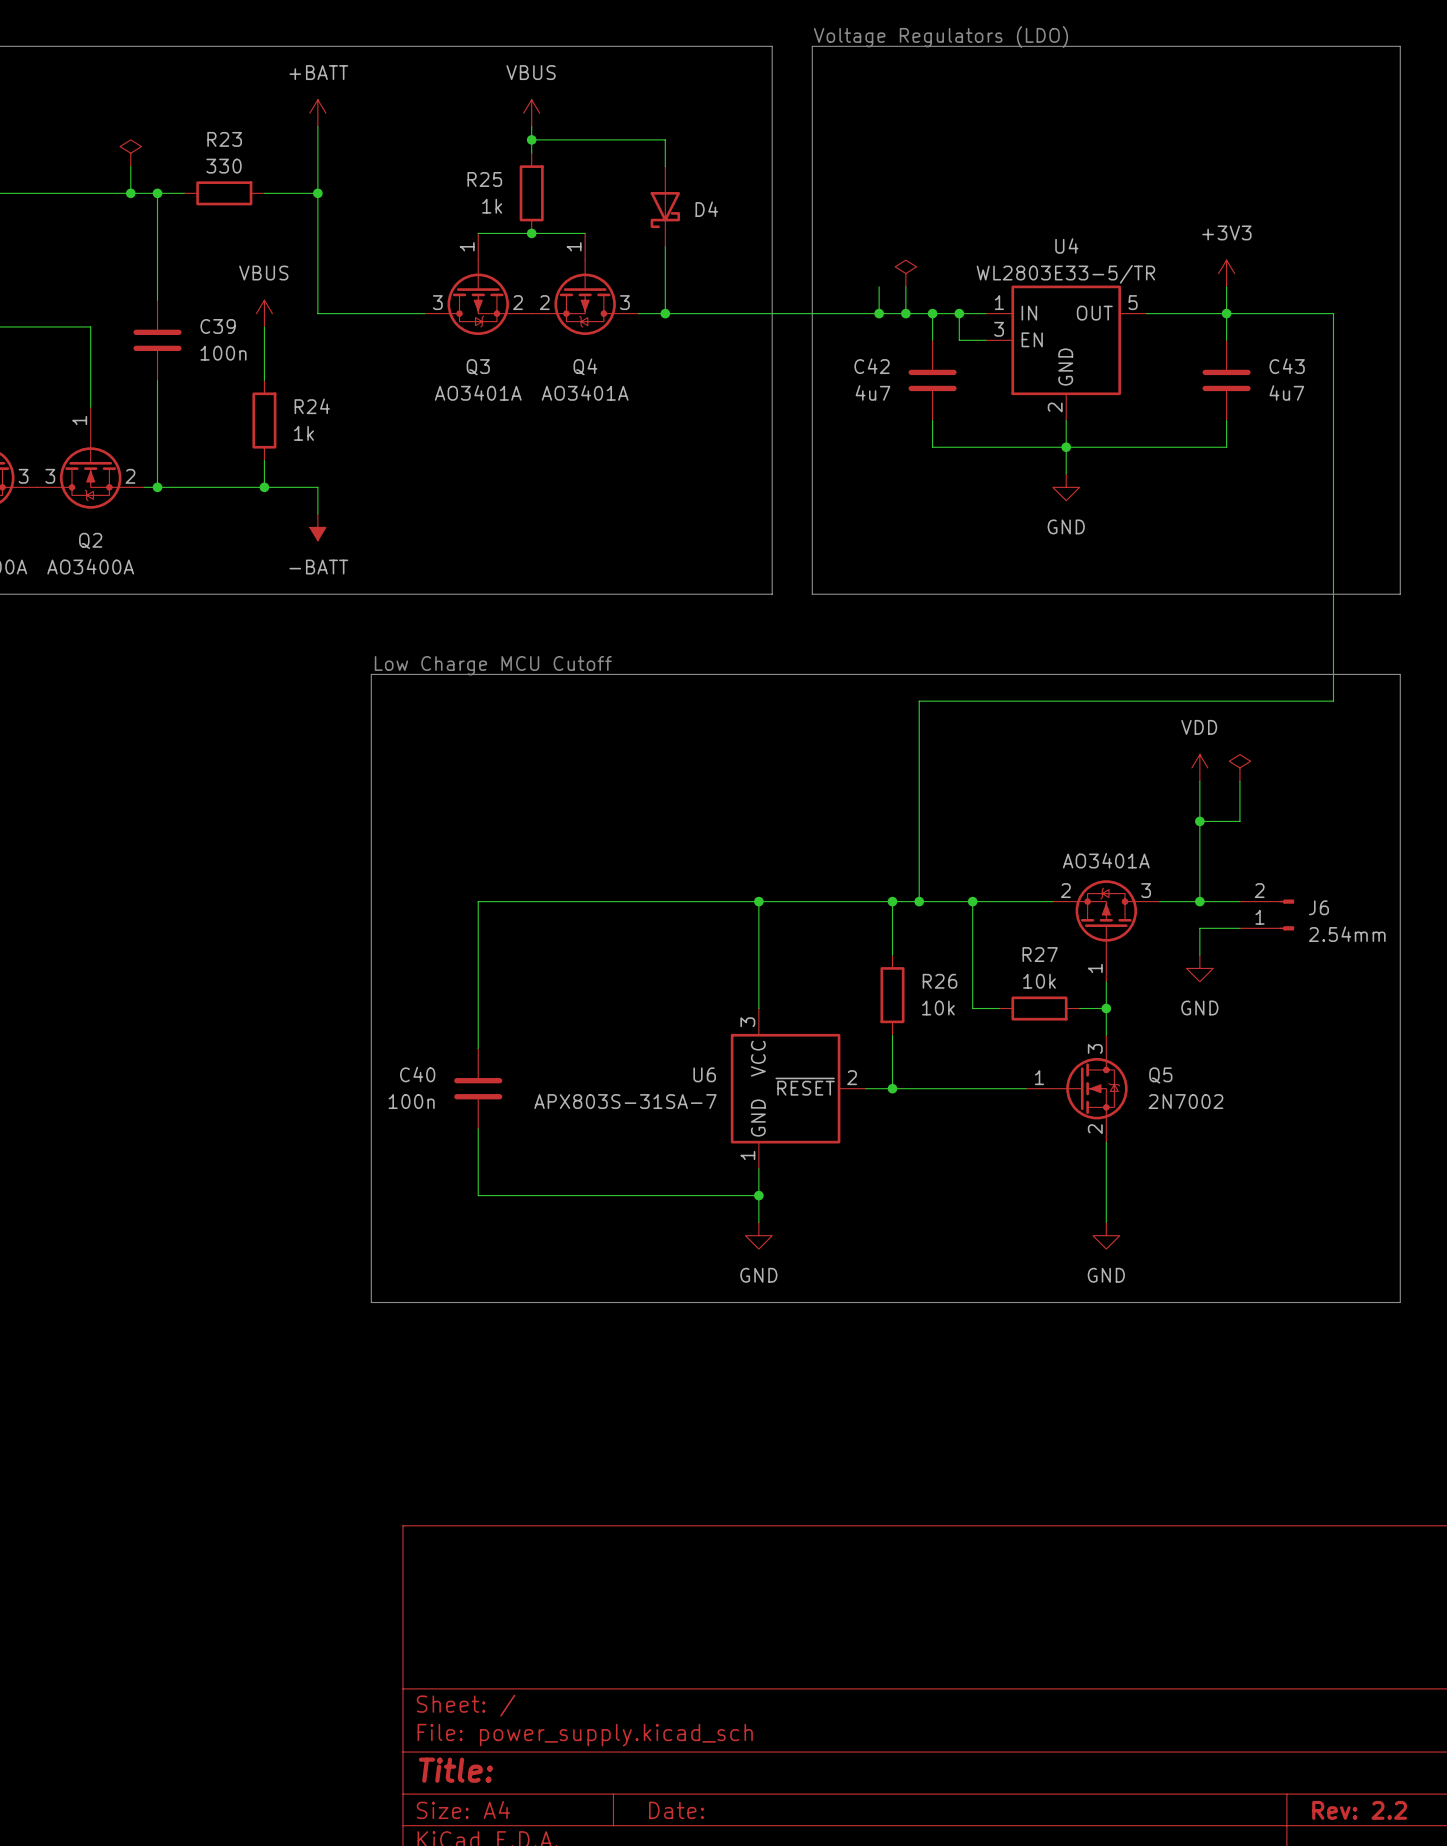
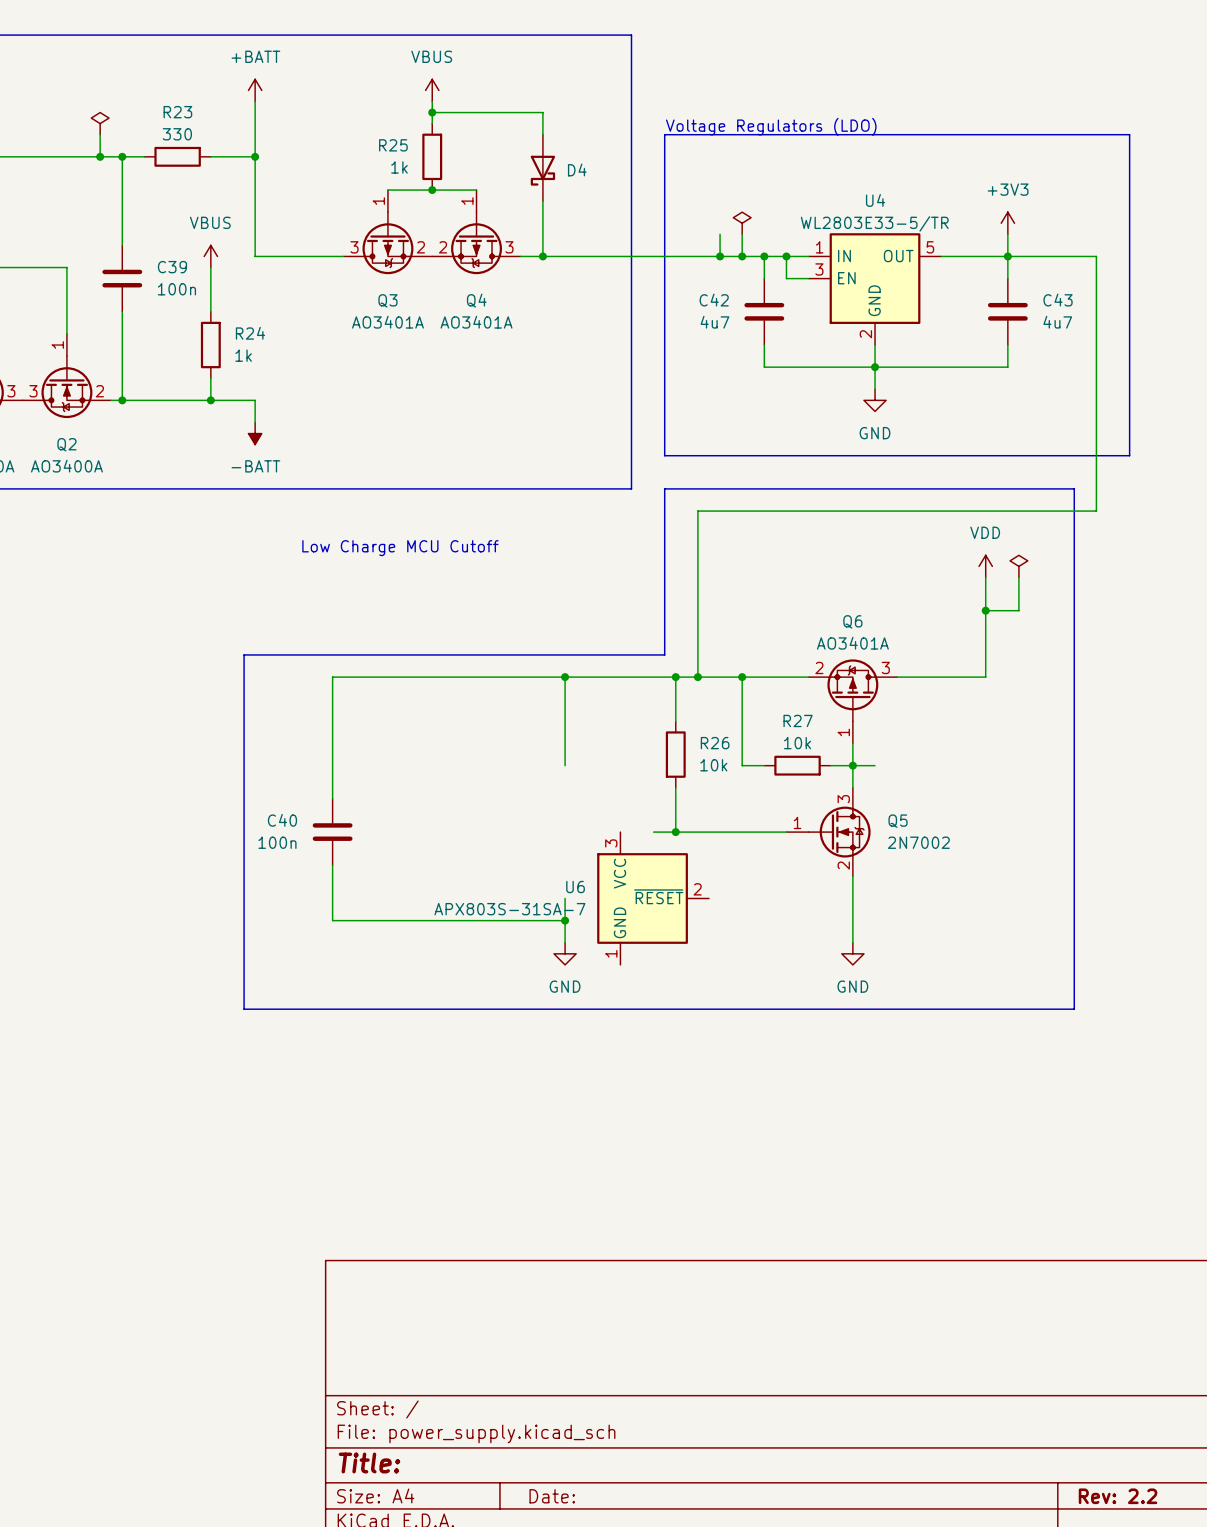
text position: Voltage Regulators (LDO) (940, 36) -> Voltage Regulators (LDO) (771, 126)
line: (812, 166) (812, 46) (1400, 46) (1400, 594) (1306, 594) -> (664, 488) (664, 654) (244, 654) (244, 1009) (1074, 1009) (1074, 488)
line: (812, 554) (812, 594) -> (664, 455) (1129, 455) (1129, 134) (664, 134)
wire: (1333, 620) (1333, 701) (919, 701) (919, 901) -> (1096, 511) (697, 511) (697, 677)
line: (371, 674) (371, 1302) (1400, 1302) (1400, 674) (371, 674) -> none
wire: none -> (985, 577) (985, 643)
wire: none -> (1018, 577) (1018, 610) (985, 610)
junction: none -> (985, 610)
power symbol position: VDD (1199, 767) -> VDD (985, 566)
power symbol position: (1239, 767) -> (1018, 566)
wire: (1239, 781) (1239, 821) (1199, 821) (1199, 901) -> none
junction: none -> (565, 677)
junction: none -> (675, 677)
junction: none -> (697, 677)
junction: none -> (742, 677)
wire: none -> (897, 677) (985, 677)
junction: (1199, 821) -> none
Q6: none -> AO3401A (852, 701)
wire: (758, 901) (758, 1008) -> (565, 677) (565, 765)
junction: (758, 901) -> none
wire: (892, 901) (892, 955) -> (675, 677) (675, 721)
junction: (892, 901) -> none
junction: (919, 901) -> none
wire: (972, 901) (972, 1008) (999, 1008) -> (742, 677) (742, 765) (764, 765)
junction: (972, 901) -> none
wire: (1052, 901) (478, 901) (478, 1048) -> (808, 677) (332, 677) (332, 798)
wire: (1159, 901) (1239, 901) -> none
junction: (1199, 901) -> none
J6: 2.54mm (1267, 914) -> none
wire: none -> (830, 765) (875, 765)
junction: none -> (852, 765)
wire: (1239, 928) (1199, 928) (1199, 955) -> none
part: AO3401A (1106, 931) -> none
power symbol: GND (1199, 968) -> none
wire: (1106, 981) (1106, 1035) -> (852, 743) (852, 787)
R26 position: (892, 995) -> (675, 754)
junction: none -> (675, 832)
R27 position: (1039, 1008) -> (797, 765)
wire: (1079, 1008) (1106, 1008) -> none
junction: (1106, 1008) -> none
wire: (892, 1035) (892, 1088) -> (675, 787) (675, 832)
C40 position: (478, 1088) -> (332, 832)
wire: (865, 1088) (1026, 1088) -> (653, 832) (786, 832)
junction: (892, 1088) -> none
Q5 position: (1076, 1088) -> (828, 832)
junction: none -> (565, 920)
wire: (478, 1128) (478, 1195) (758, 1195) -> (332, 865) (332, 920) (565, 920)
wire: (1106, 1142) (1106, 1222) -> (852, 876) (852, 942)
wire: (758, 1168) (758, 1222) -> (565, 898) (565, 942)
junction: (758, 1195) -> none
power symbol position: GND (758, 1235) -> GND (565, 953)
power symbol position: GND (1106, 1235) -> GND (852, 953)

